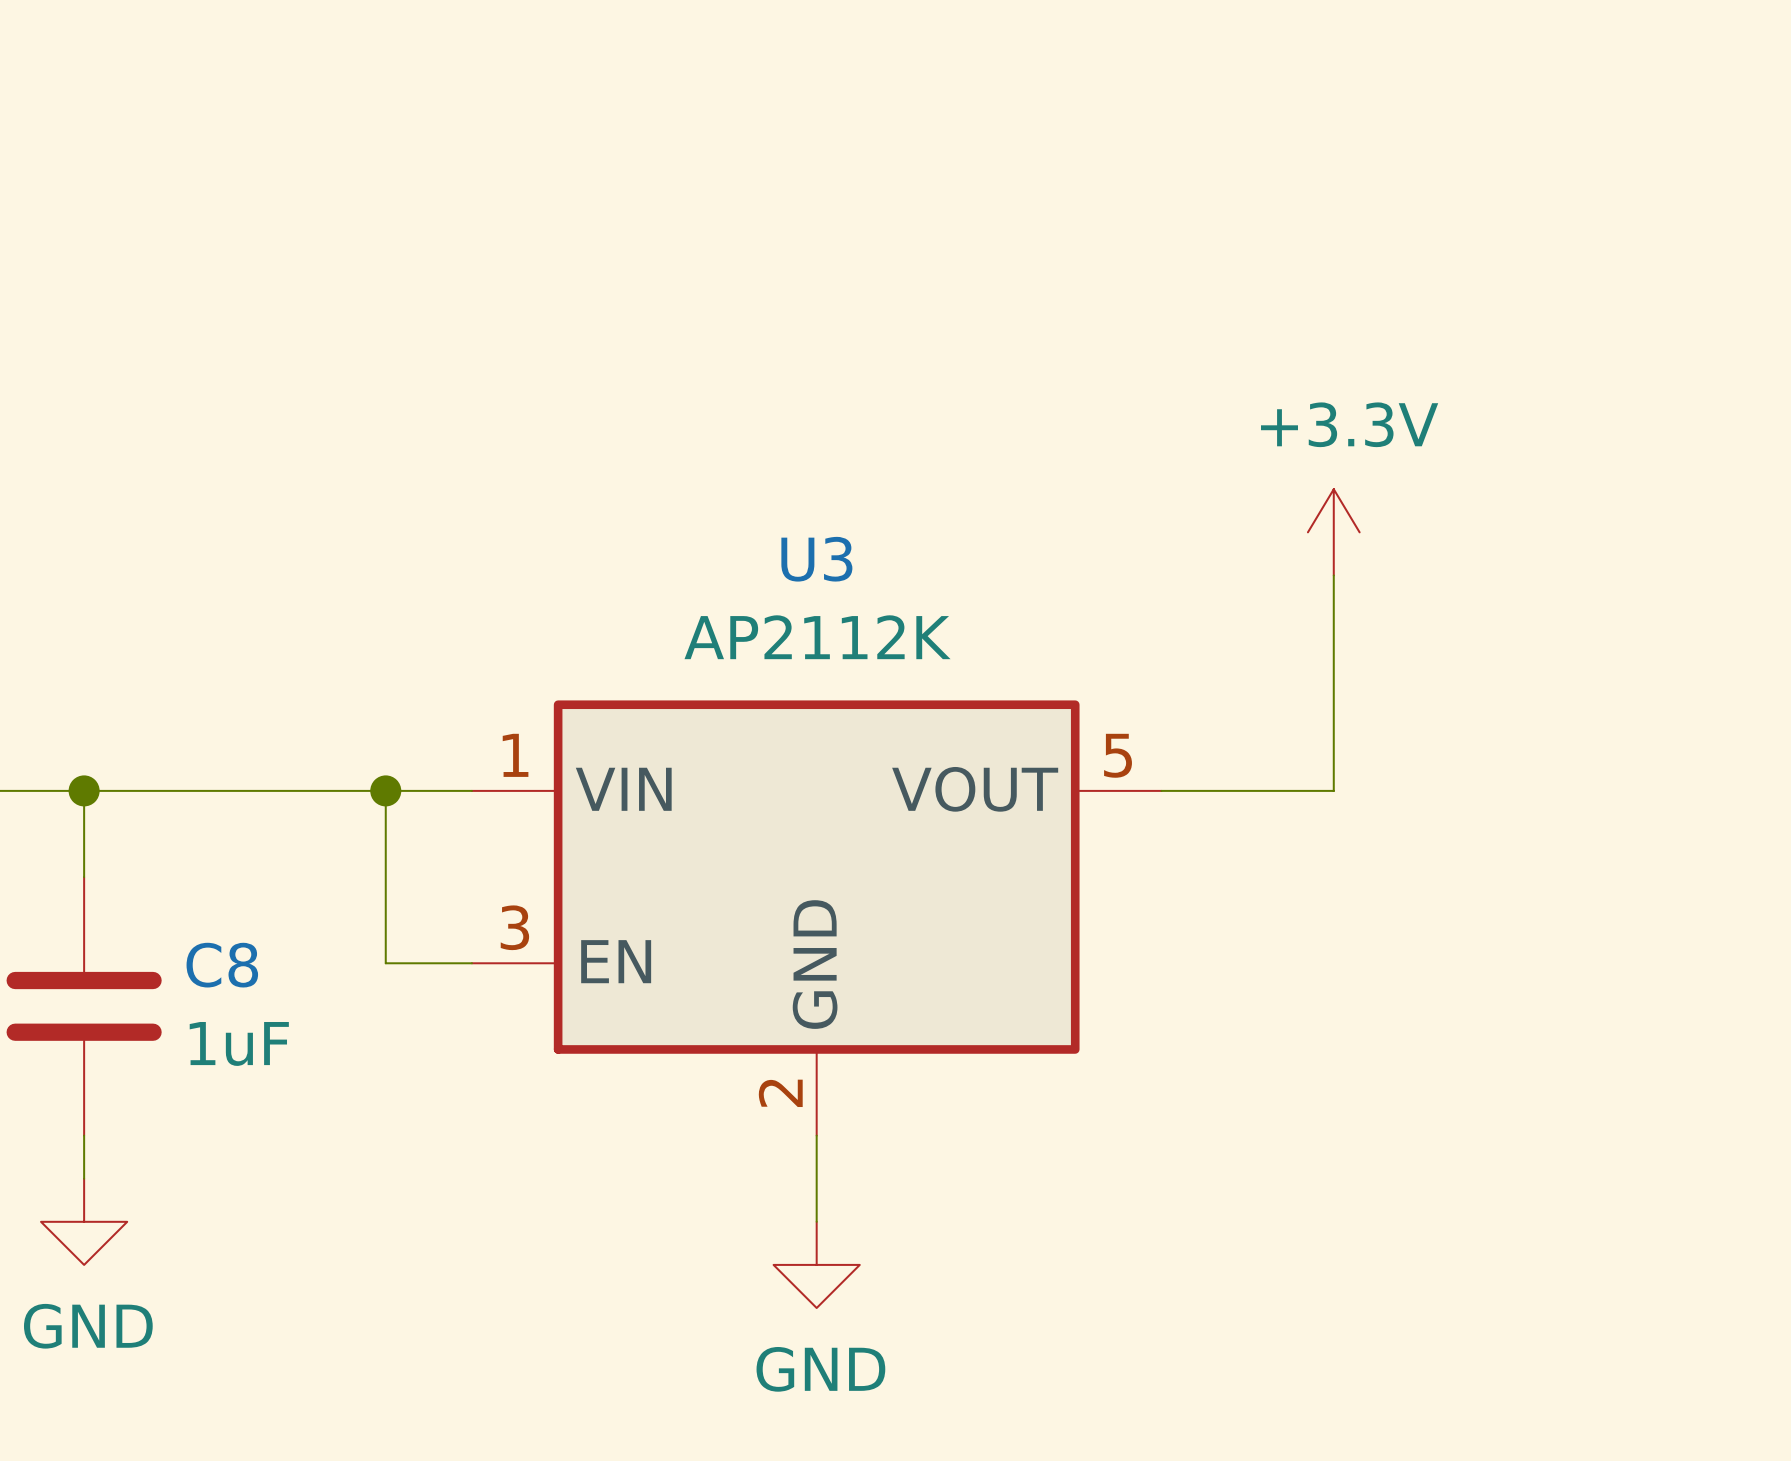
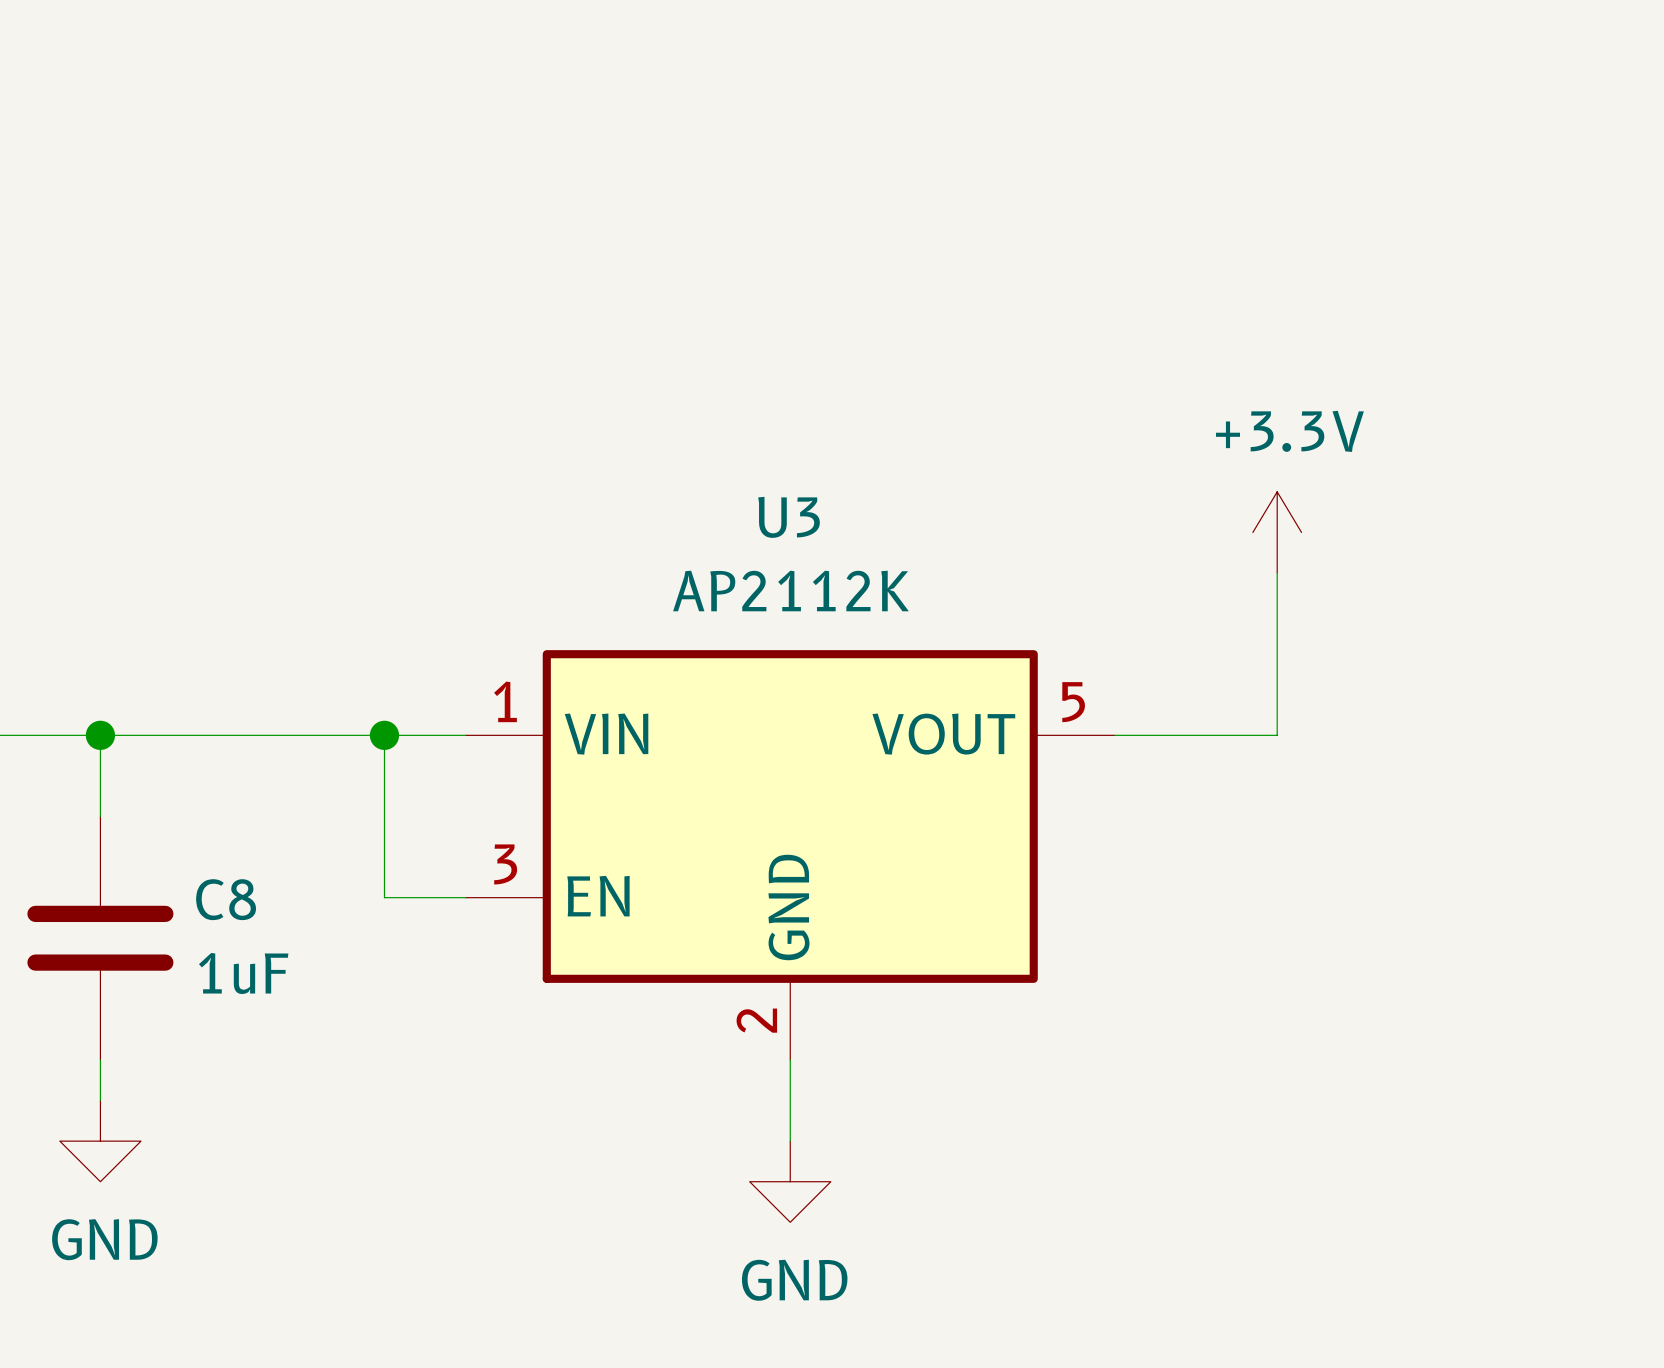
power symbol position: +3.3V (1333, 532) -> +3.3V (1277, 532)

